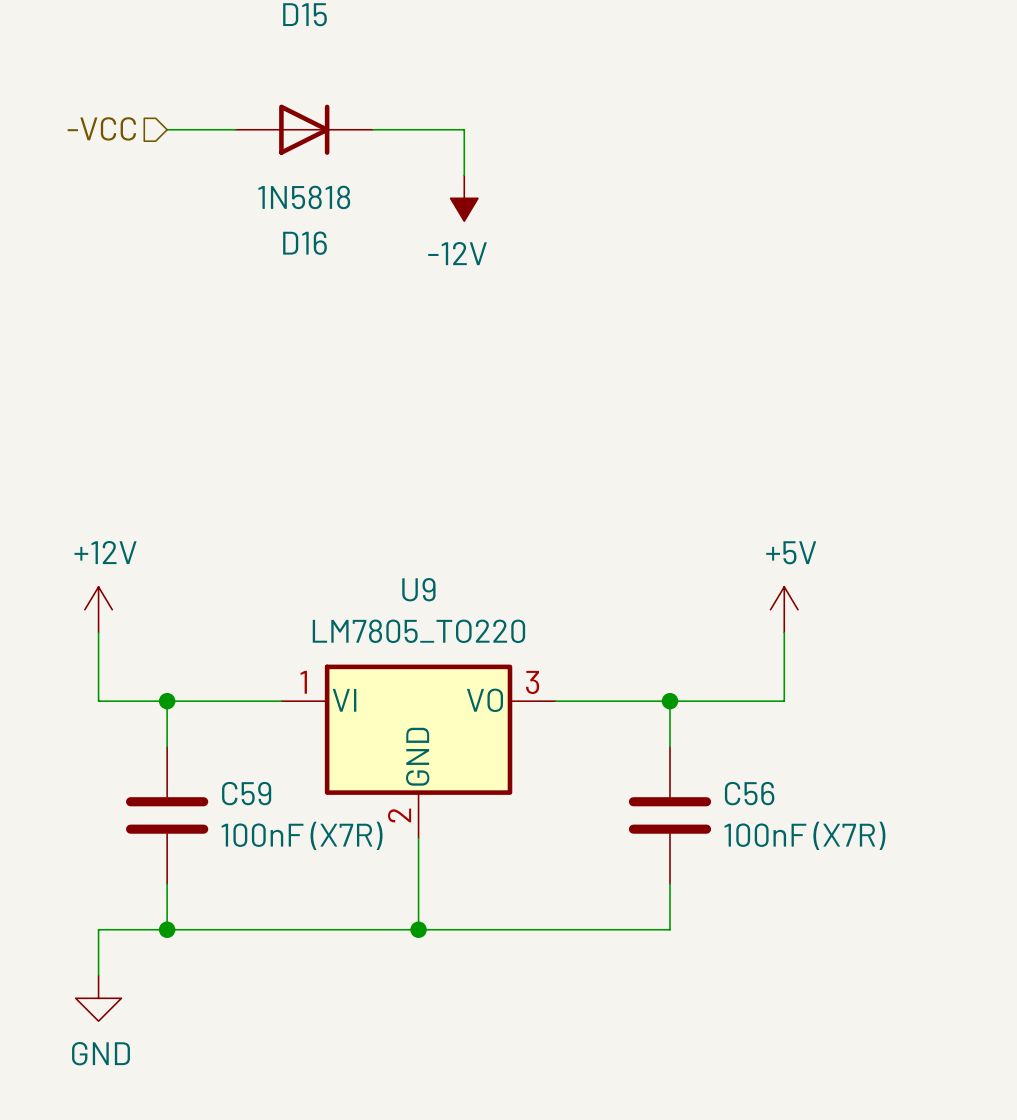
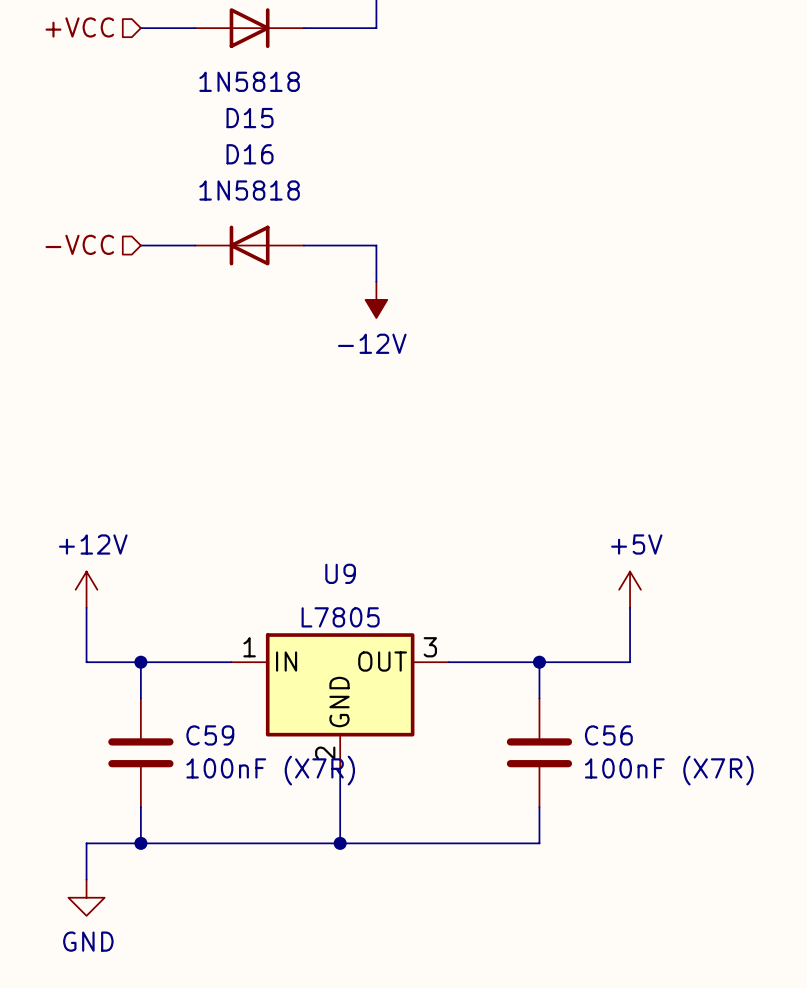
hierarchical label position: -VCC (101, 128) -> -VCC (79, 244)
wire: (167, 129) (235, 129) -> (140, 245) (195, 245)
D16 rotation: 0° (304, 129) -> 180° (249, 245)
wire: (372, 129) (464, 129) (464, 175) -> (303, 245) (376, 245) (376, 281)
power symbol position: -12V (464, 198) -> -12V (376, 299)
U9 value: LM7805_TO220 (418, 631) -> L7805 (340, 617)
U9 pin name: VI (344, 700) -> IN (286, 661)
U9 pin name: VO (485, 700) -> OUT (382, 661)

